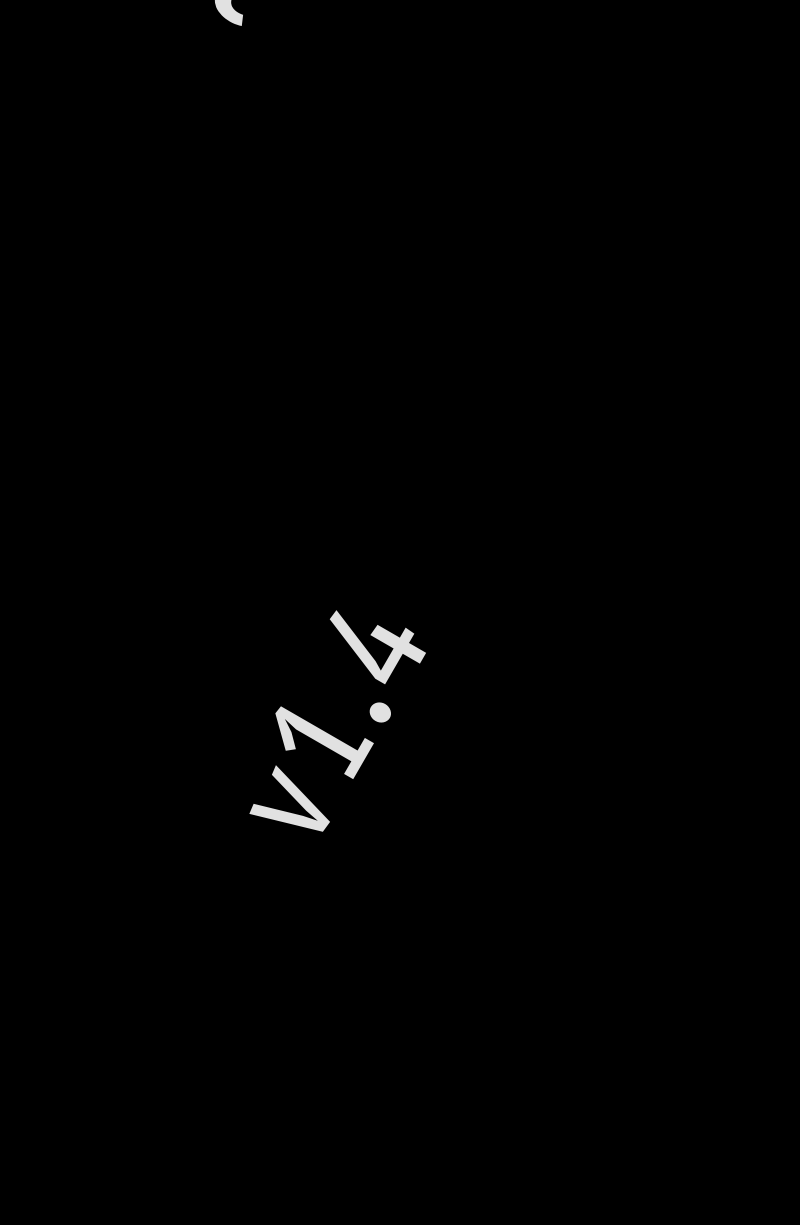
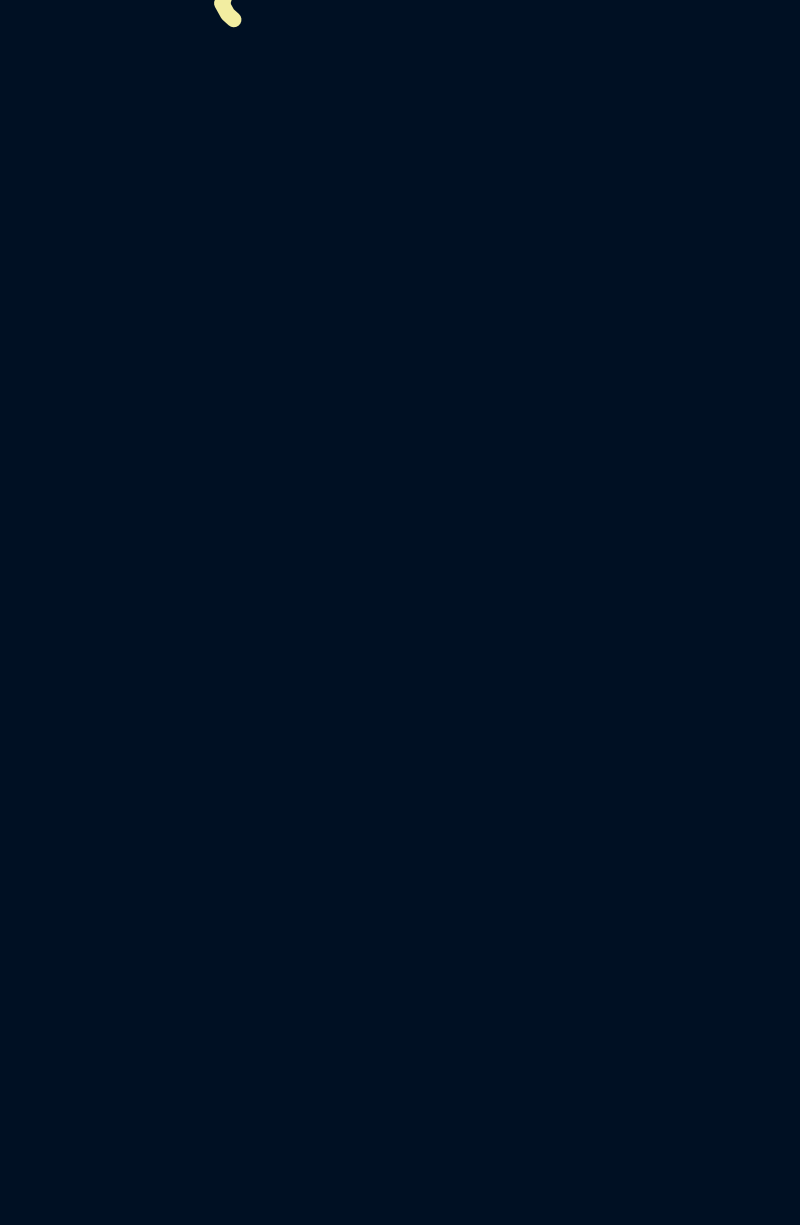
text: v1.4 (337, 720) -> none

